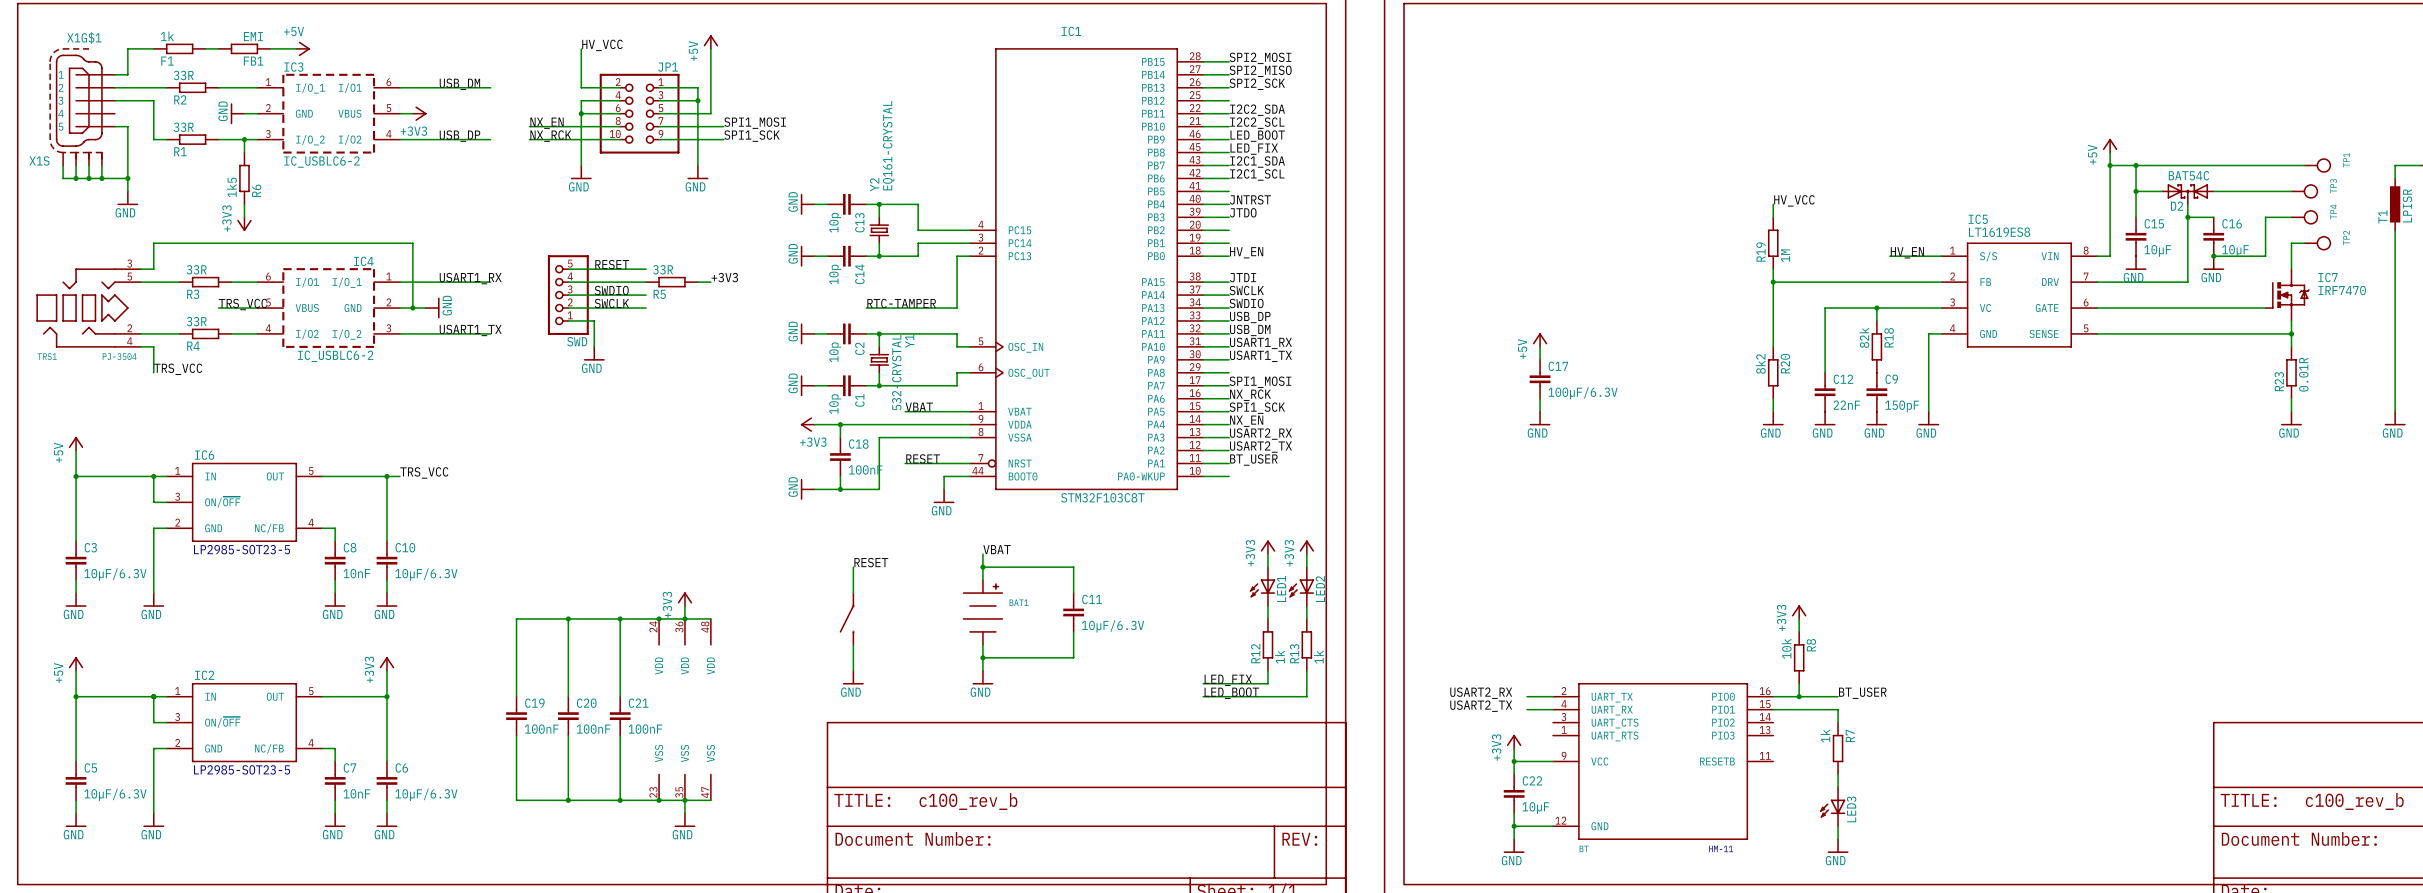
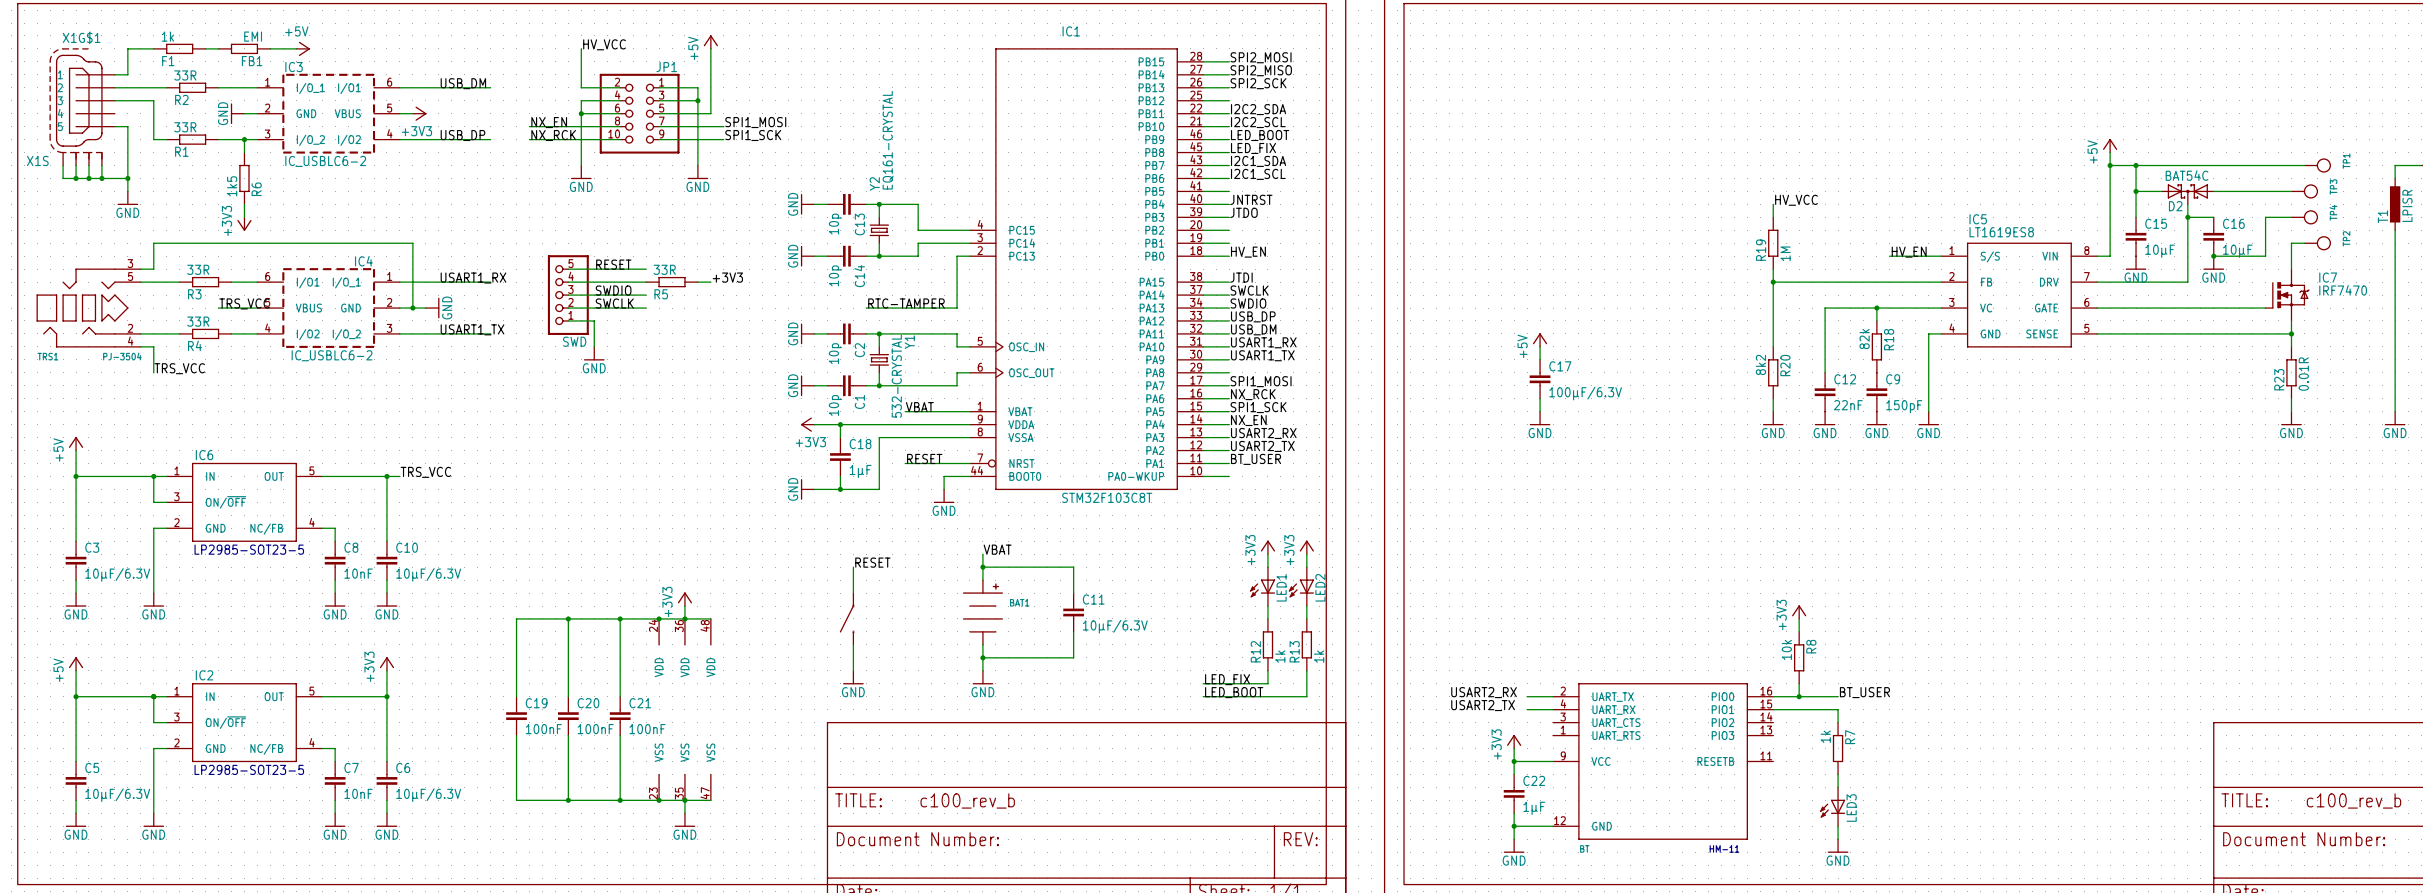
C18 value: 100nF (865, 469) -> 1µF (860, 471)
C22 value: 10µF (1535, 808) -> 1µF (1534, 808)

